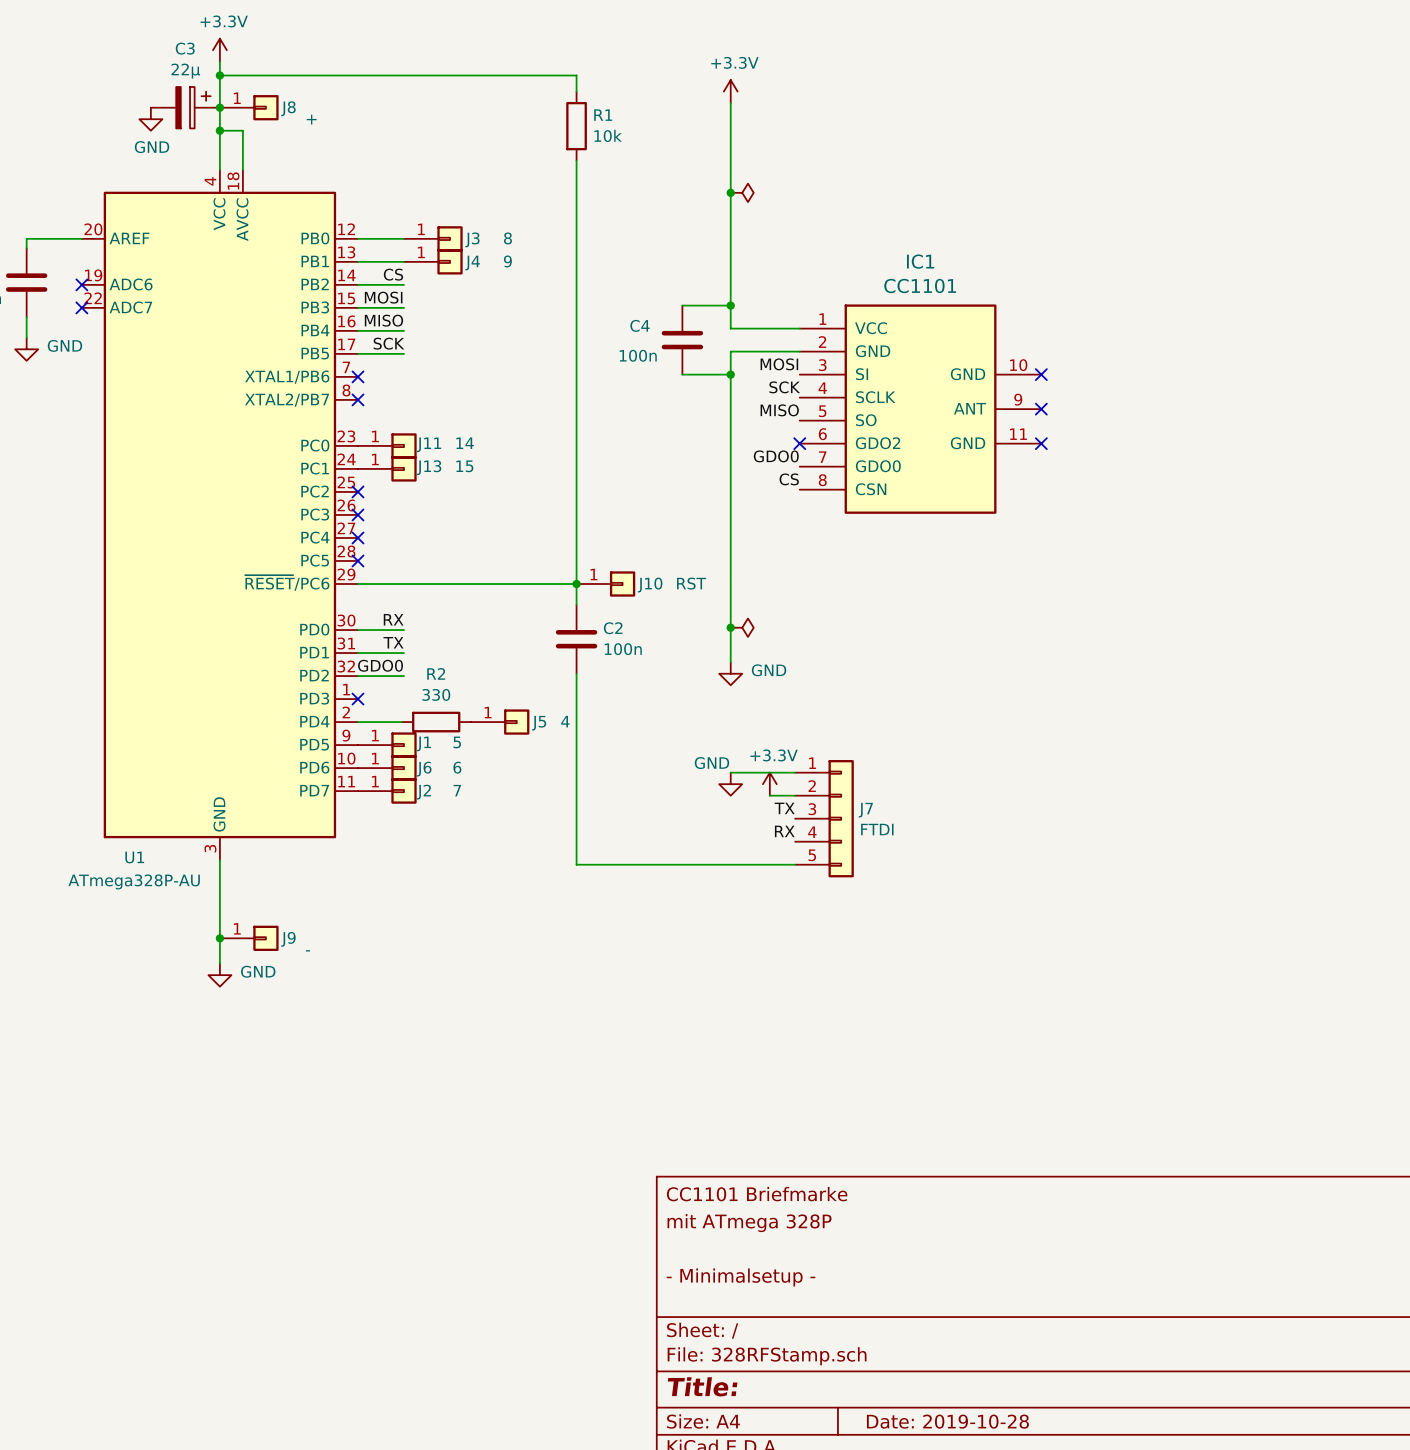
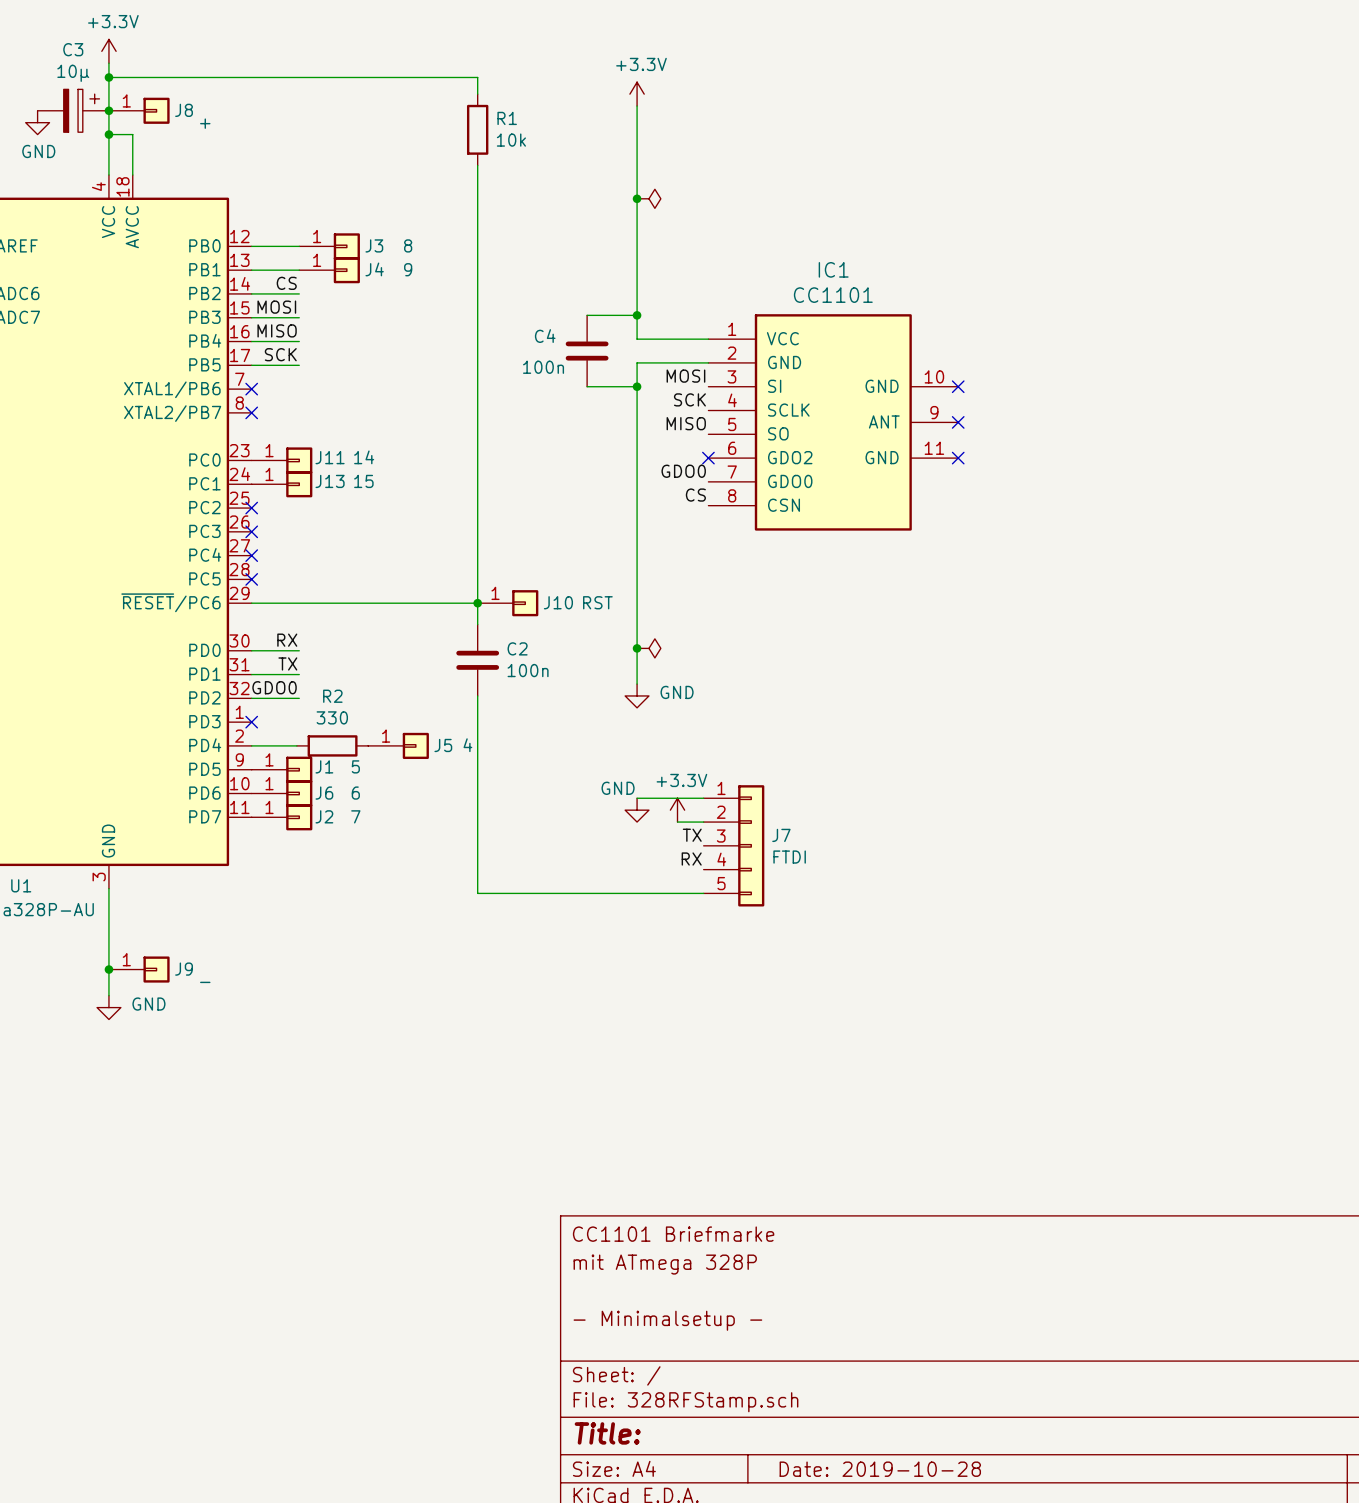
C3 value: 22µ (185, 71) -> 10µ (73, 73)

